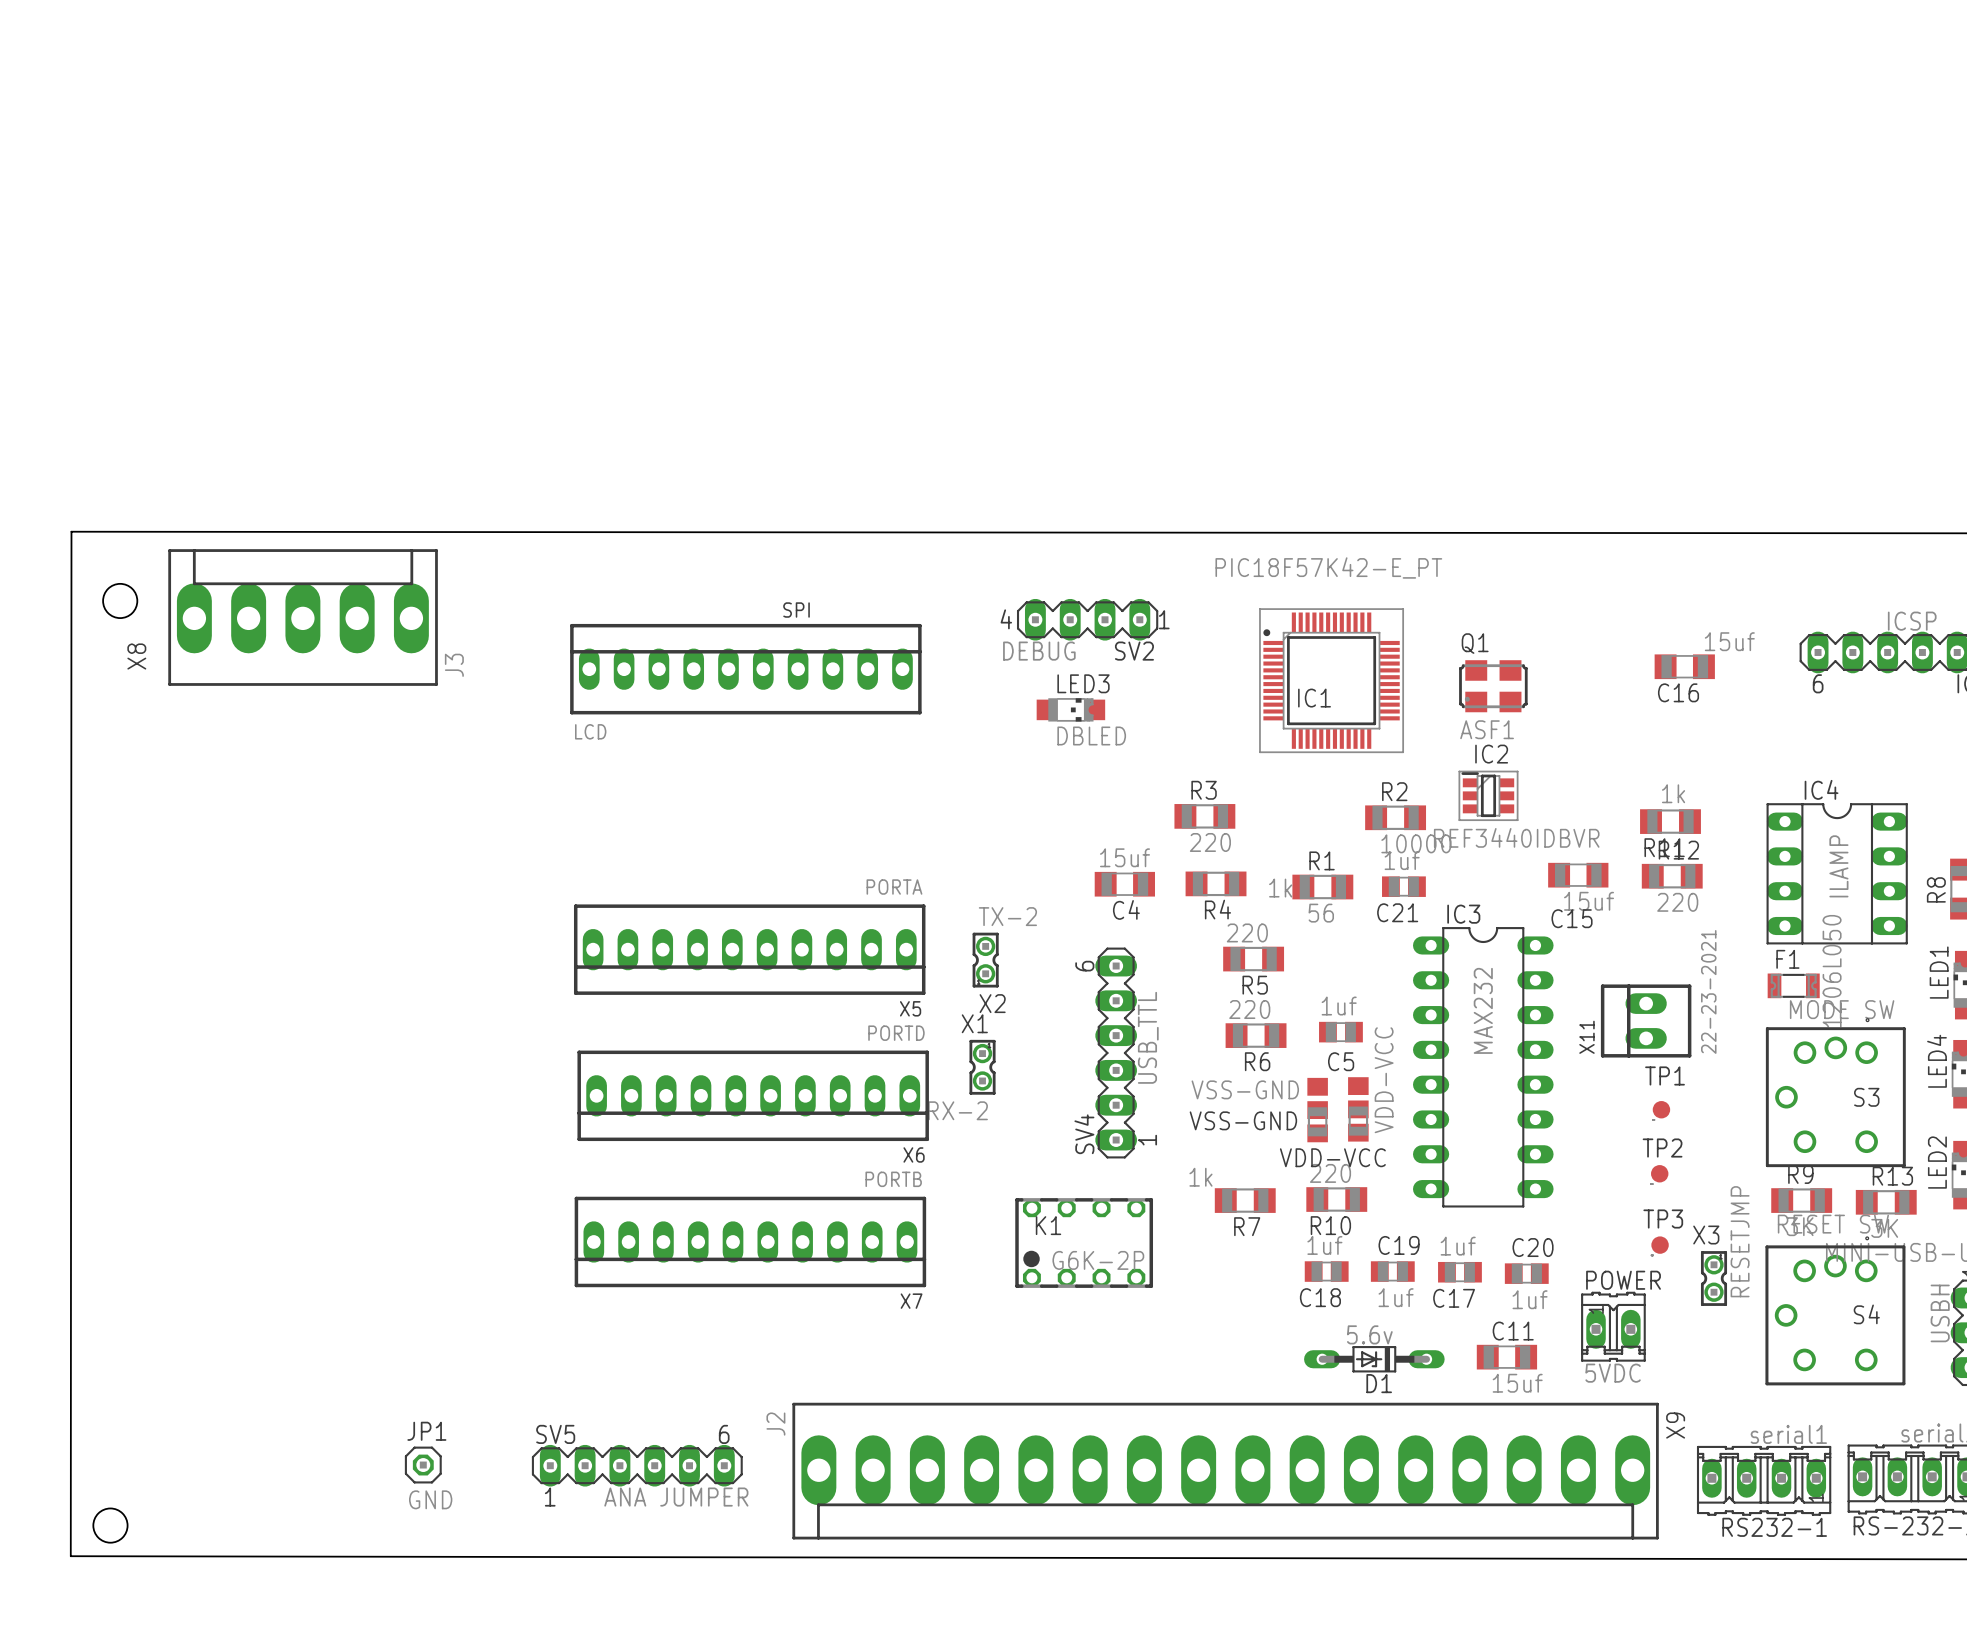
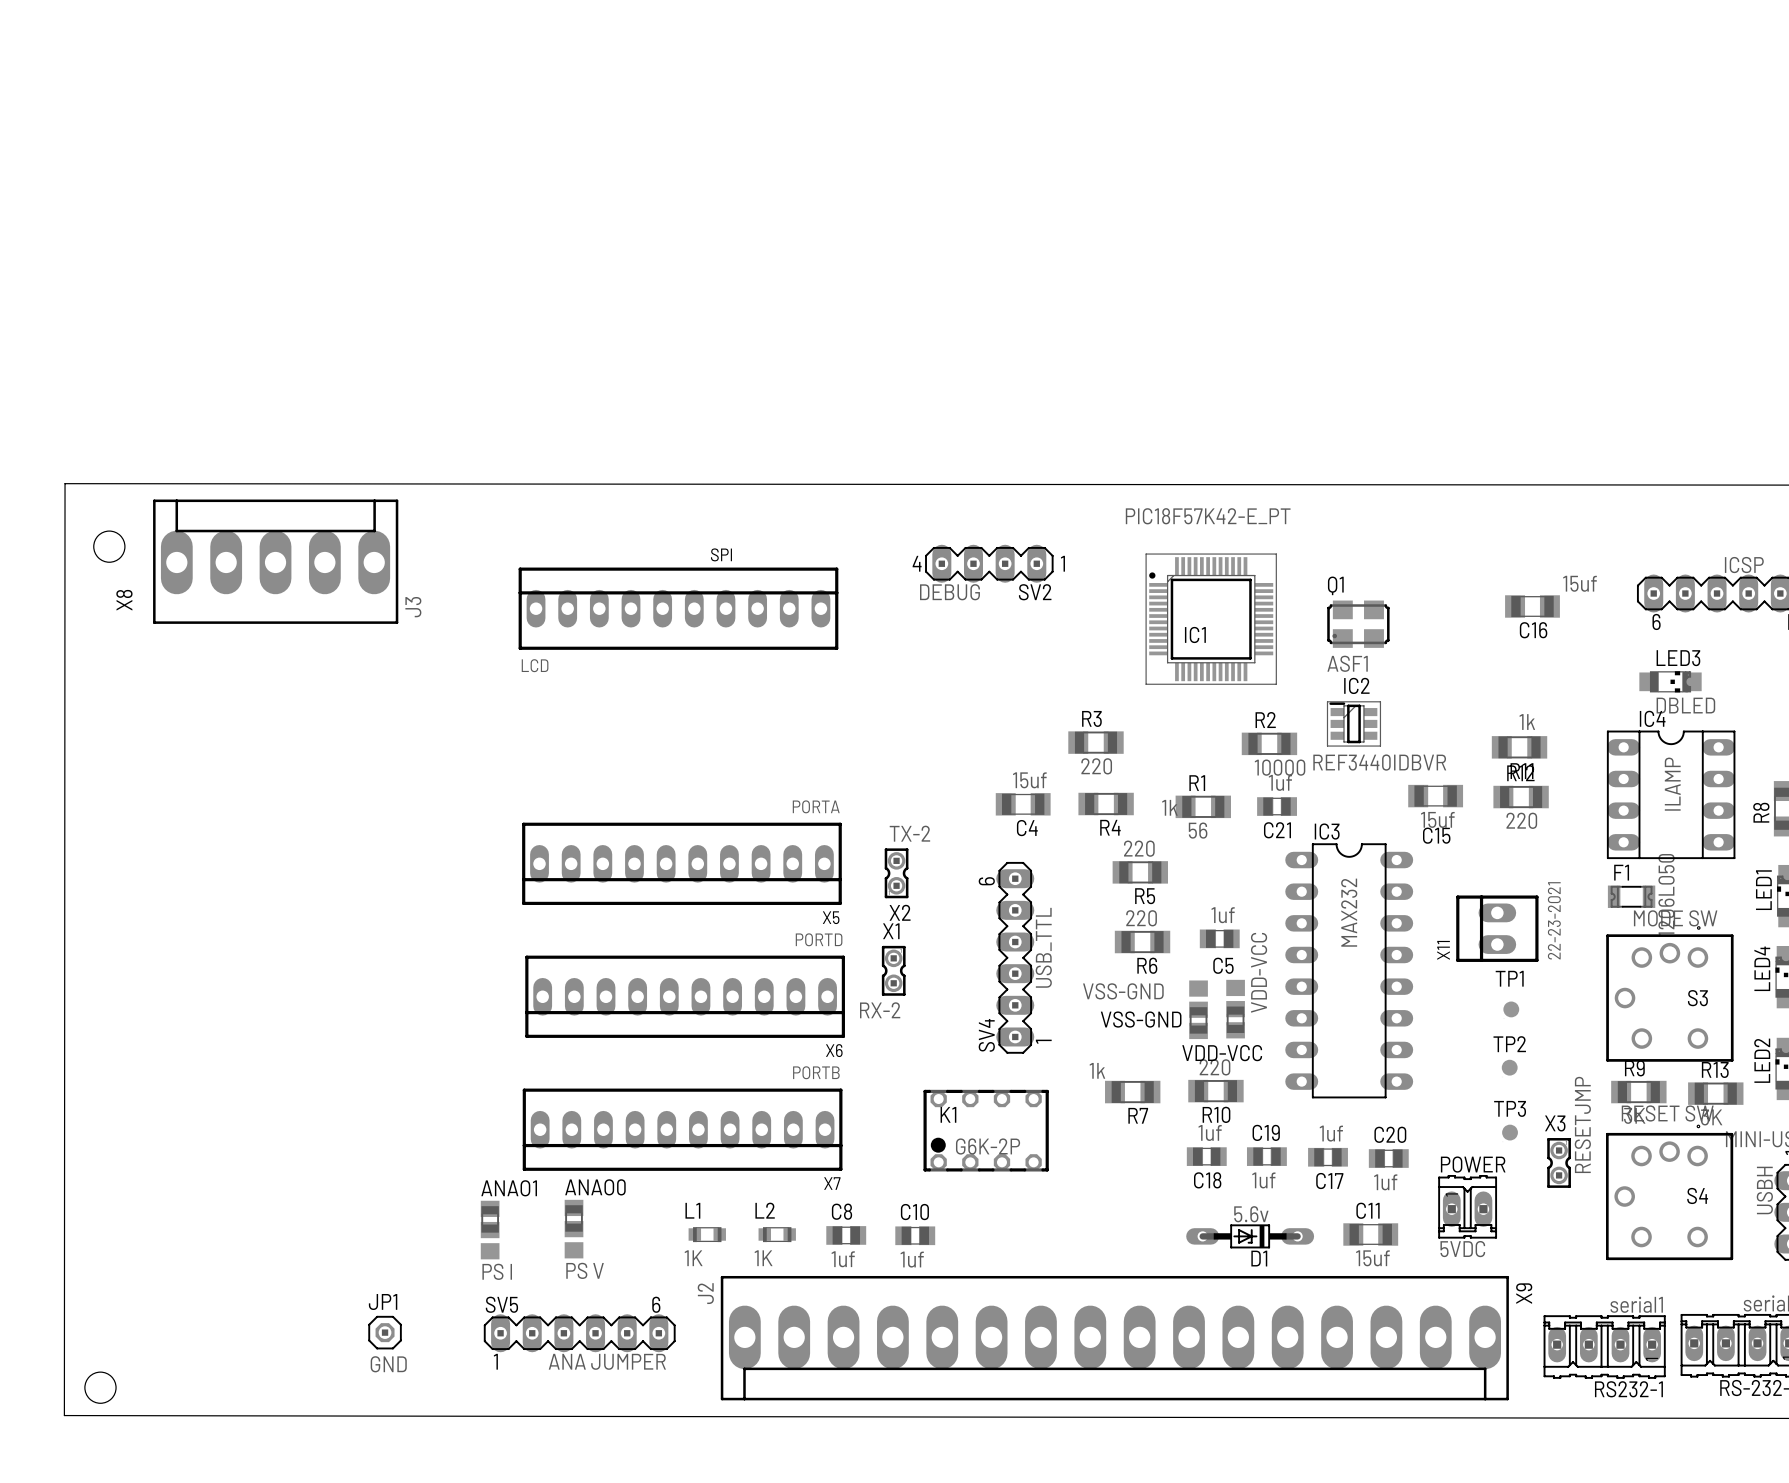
LED3 position: (1070, 709) -> (1670, 681)
ANAO0: none -> PS V (574, 1229)
ANAO1: none -> PS I (490, 1230)
L1: none -> 1K (707, 1234)
L2: none -> 1K (777, 1234)
C8: none -> 1uf (846, 1235)
C10: none -> 1uf (915, 1235)

